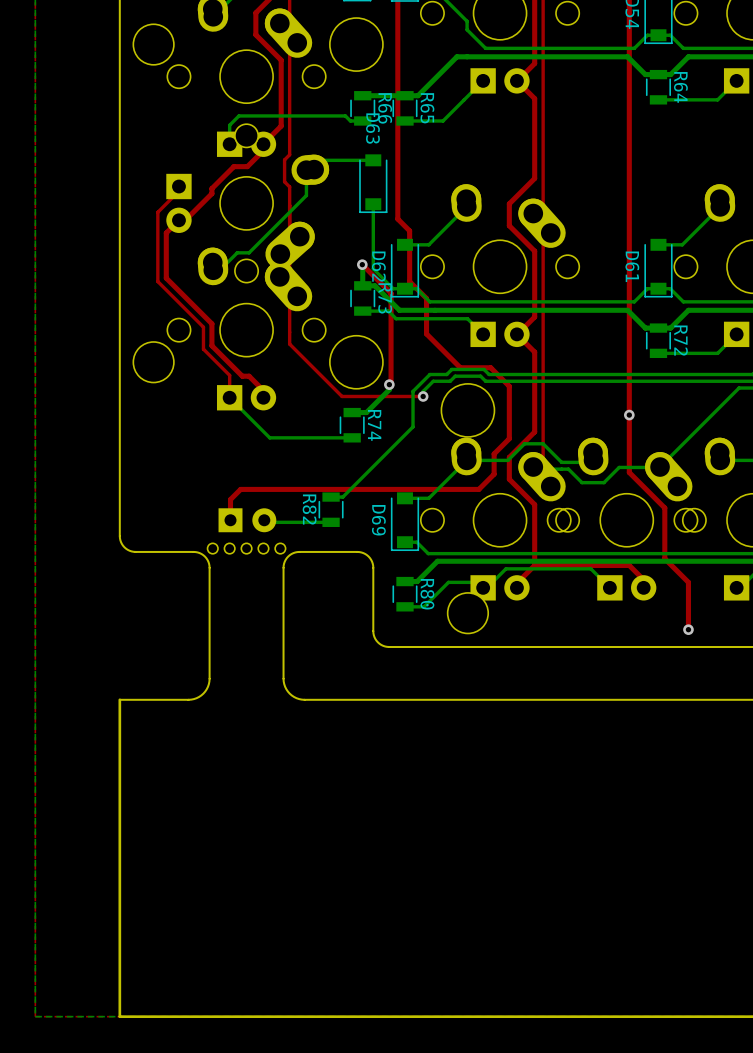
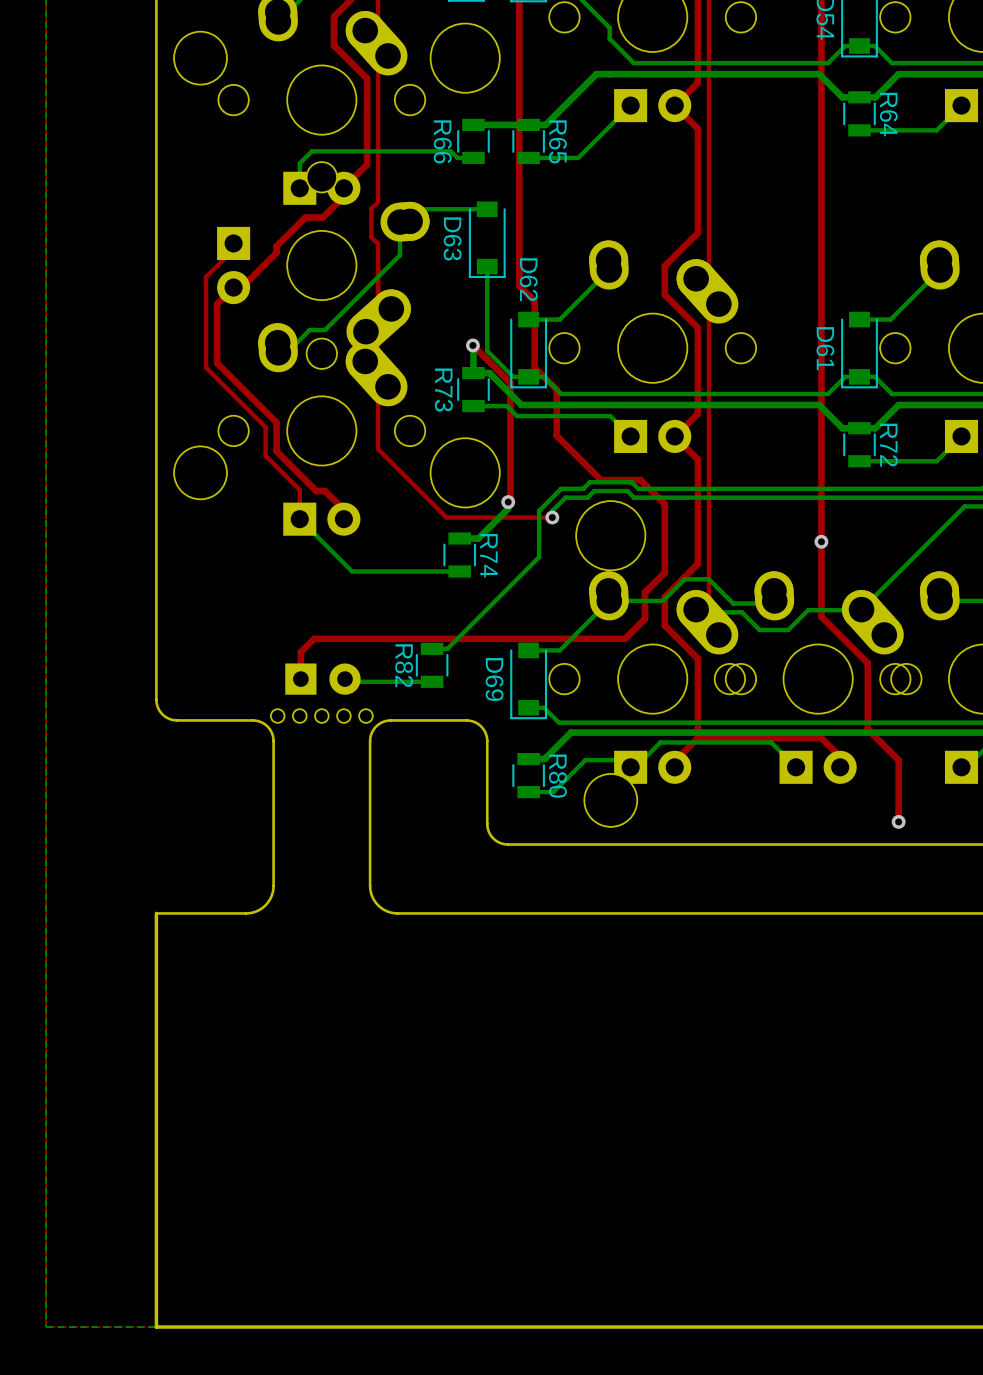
R66 name position: R66 (385, 108) -> R66 (442, 141)
D63 name position: D63 (372, 128) -> D63 (452, 238)
D62 name position: D62 (378, 266) -> D62 (528, 279)
R73 name position: R73 (385, 298) -> R73 (443, 390)

